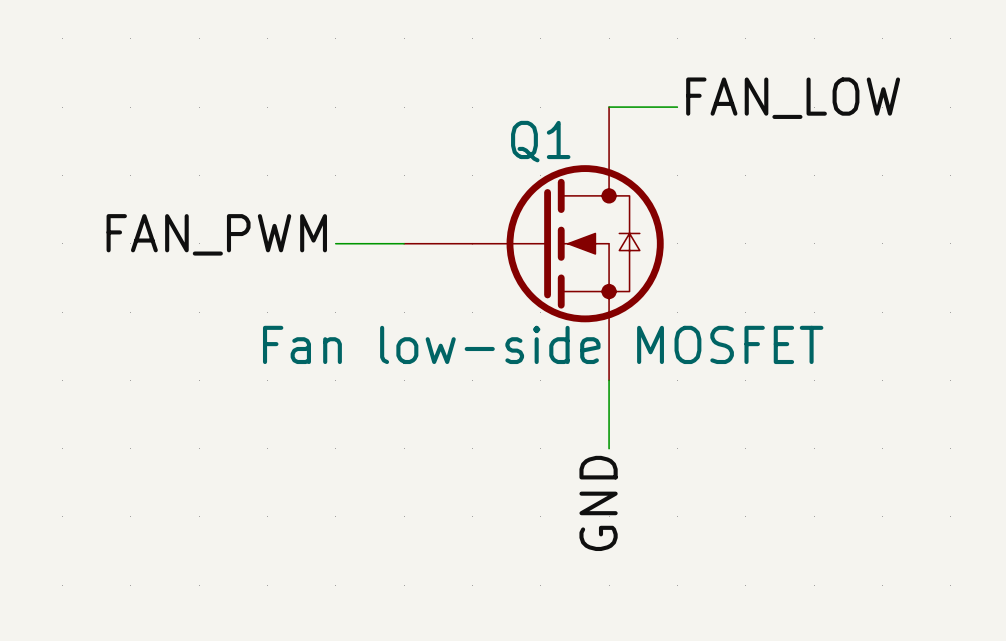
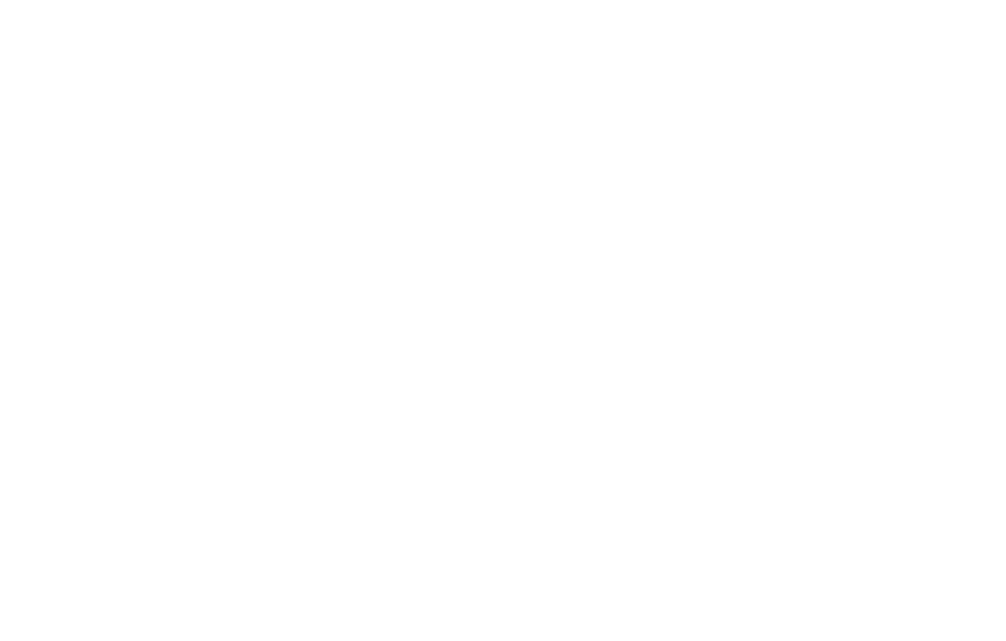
label: FAN_LOW (793, 98) -> none
wire: (609, 107) (677, 107) -> none
label: FAN_PWM (216, 234) -> none
wire: (335, 243) (404, 243) -> none
Q1: Fan low-side MOSFET (533, 243) -> none
wire: (609, 380) (609, 448) -> none
label: GND (598, 503) -> none

